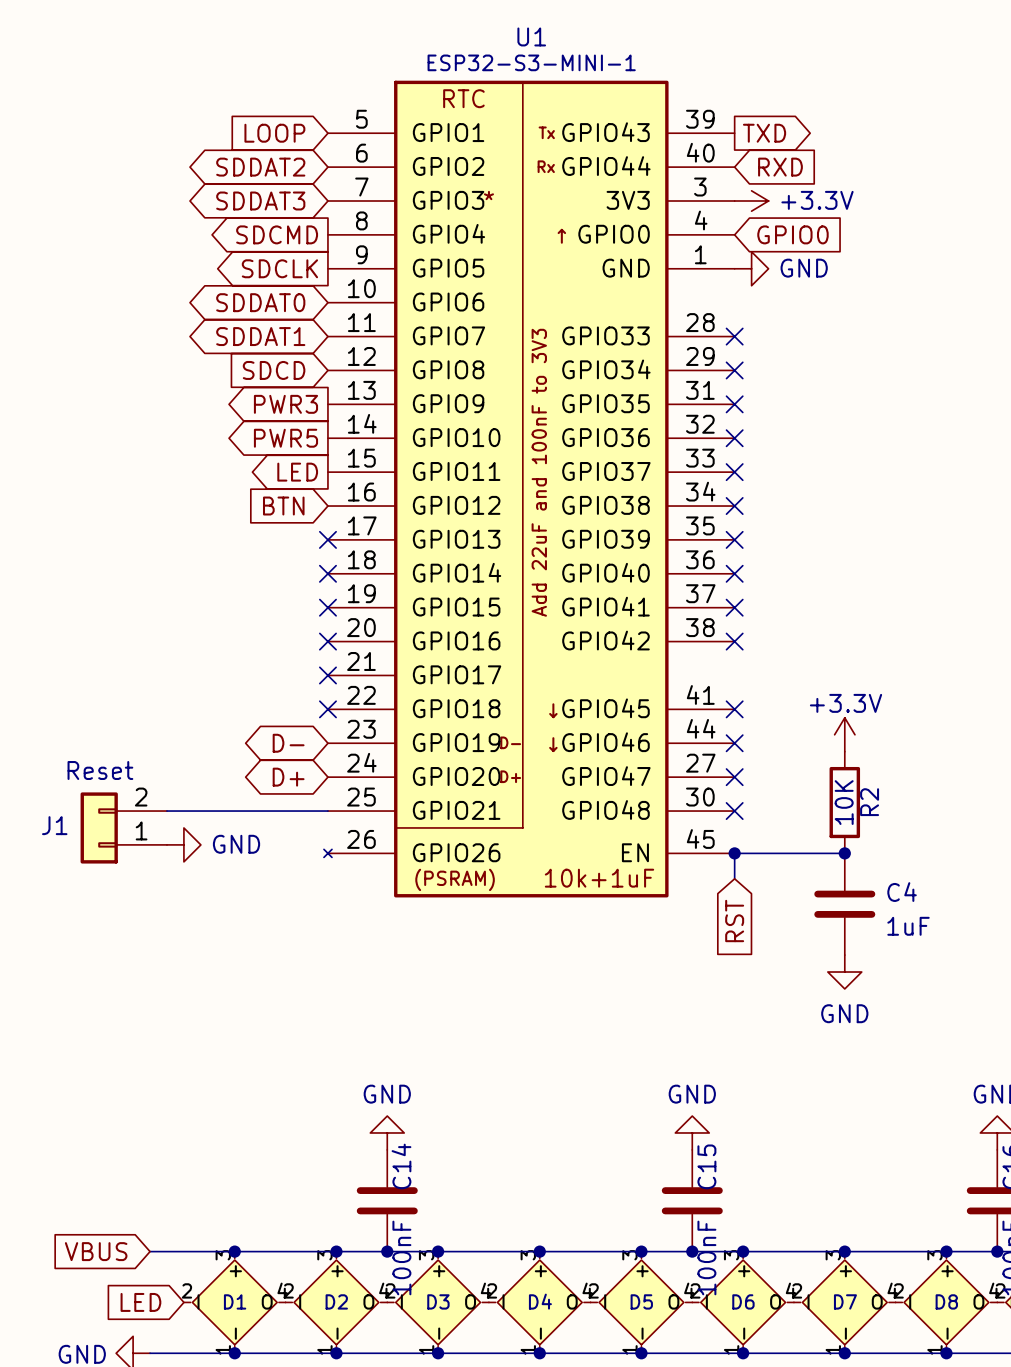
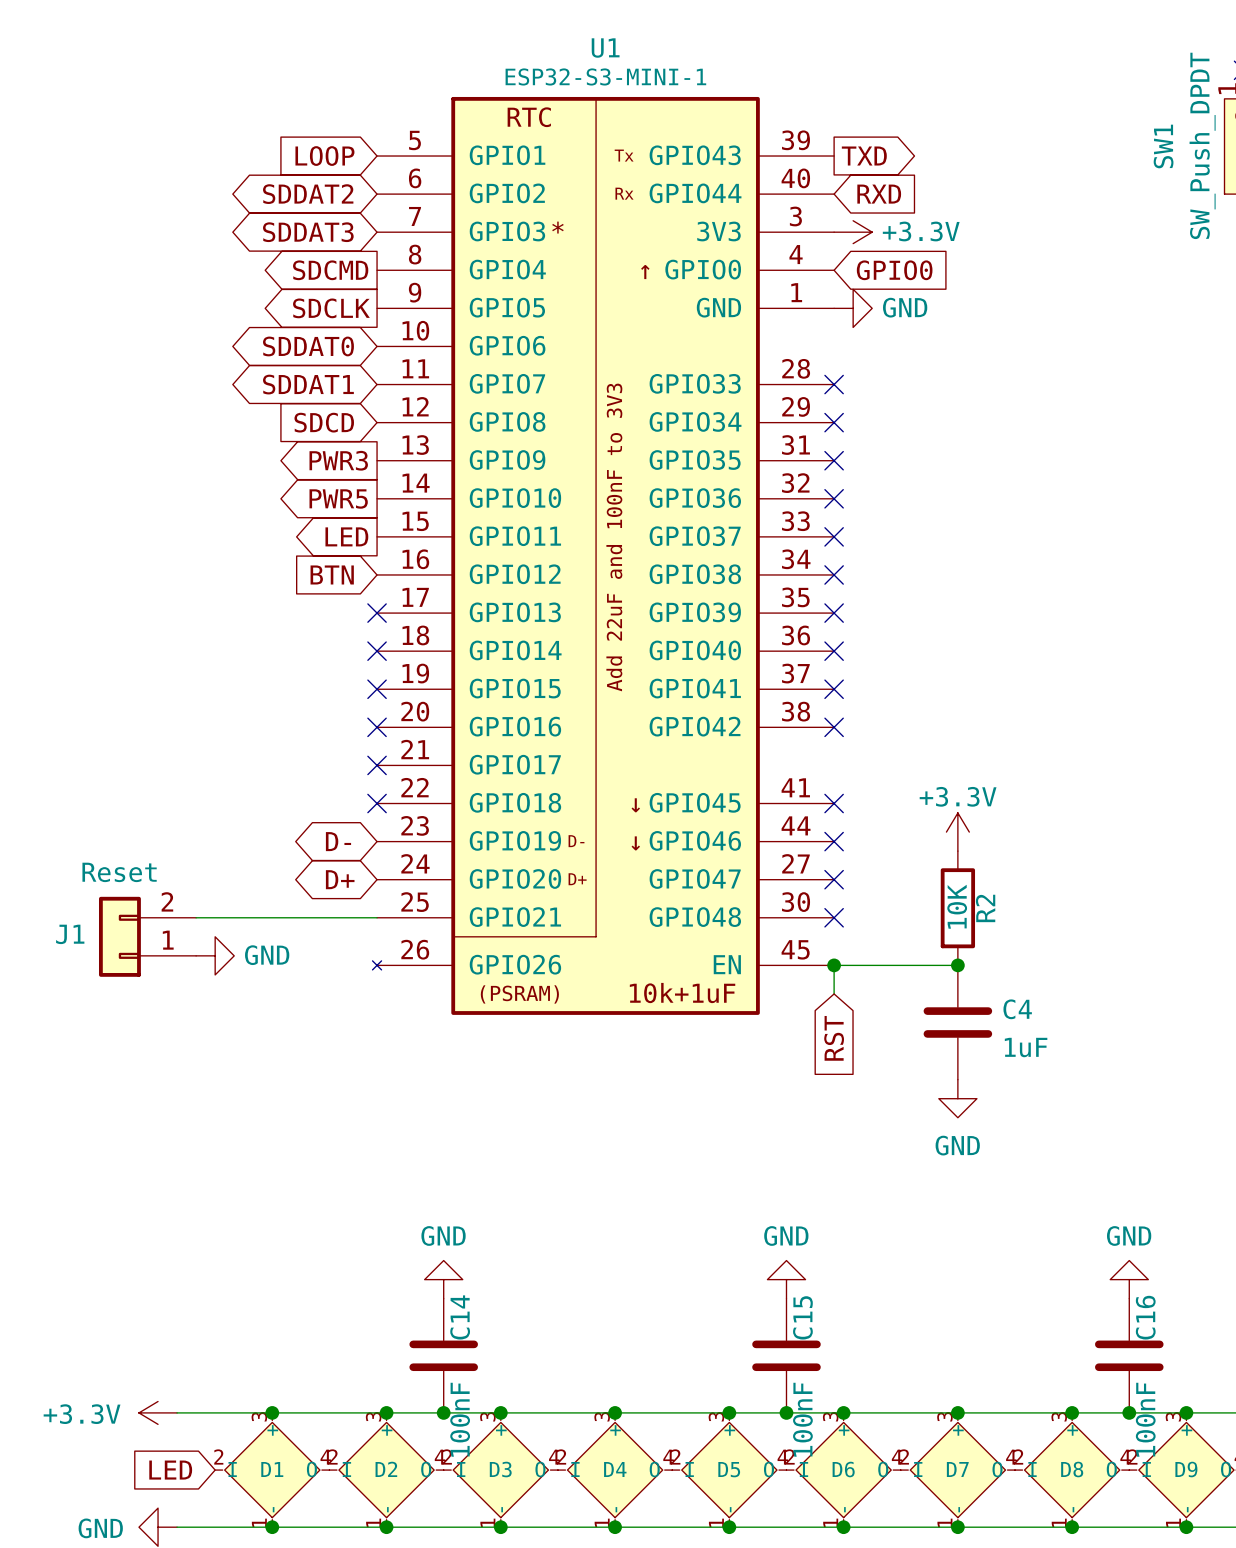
global label: VBUS (96, 1251) -> none
power symbol: none -> +3.3V (158, 1412)

